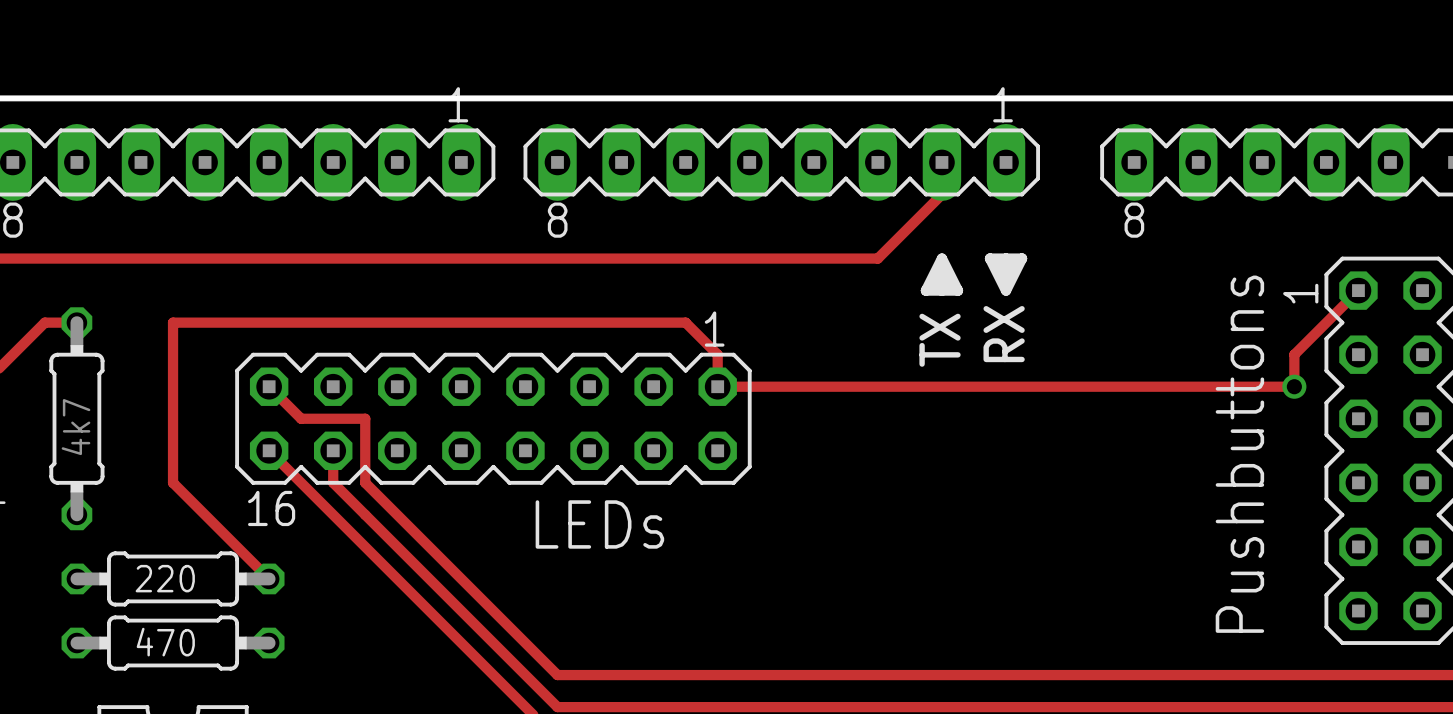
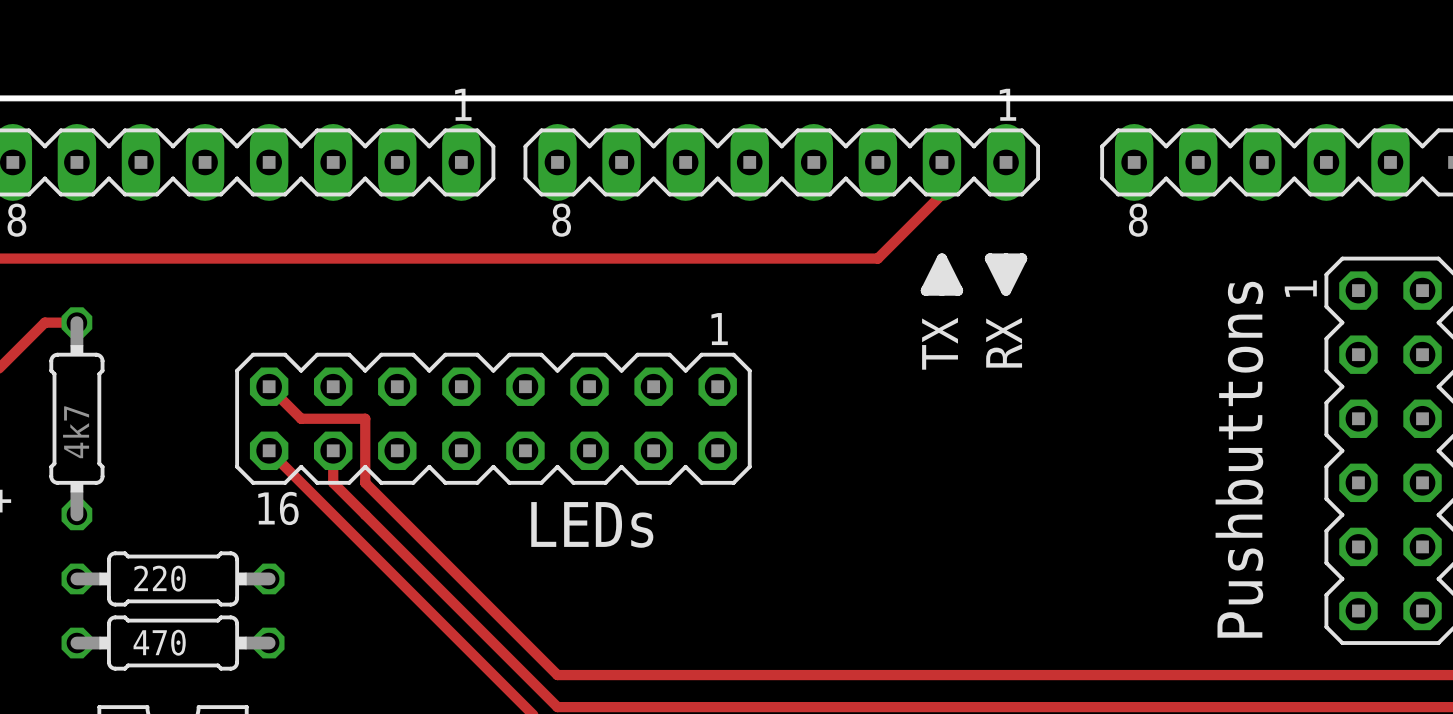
track: (1358, 290) (1294, 354) (1294, 386) (717, 386) (717, 354) (685, 322) (173, 322) (173, 482) (269, 578) -> none
via: (1294, 386) -> none

